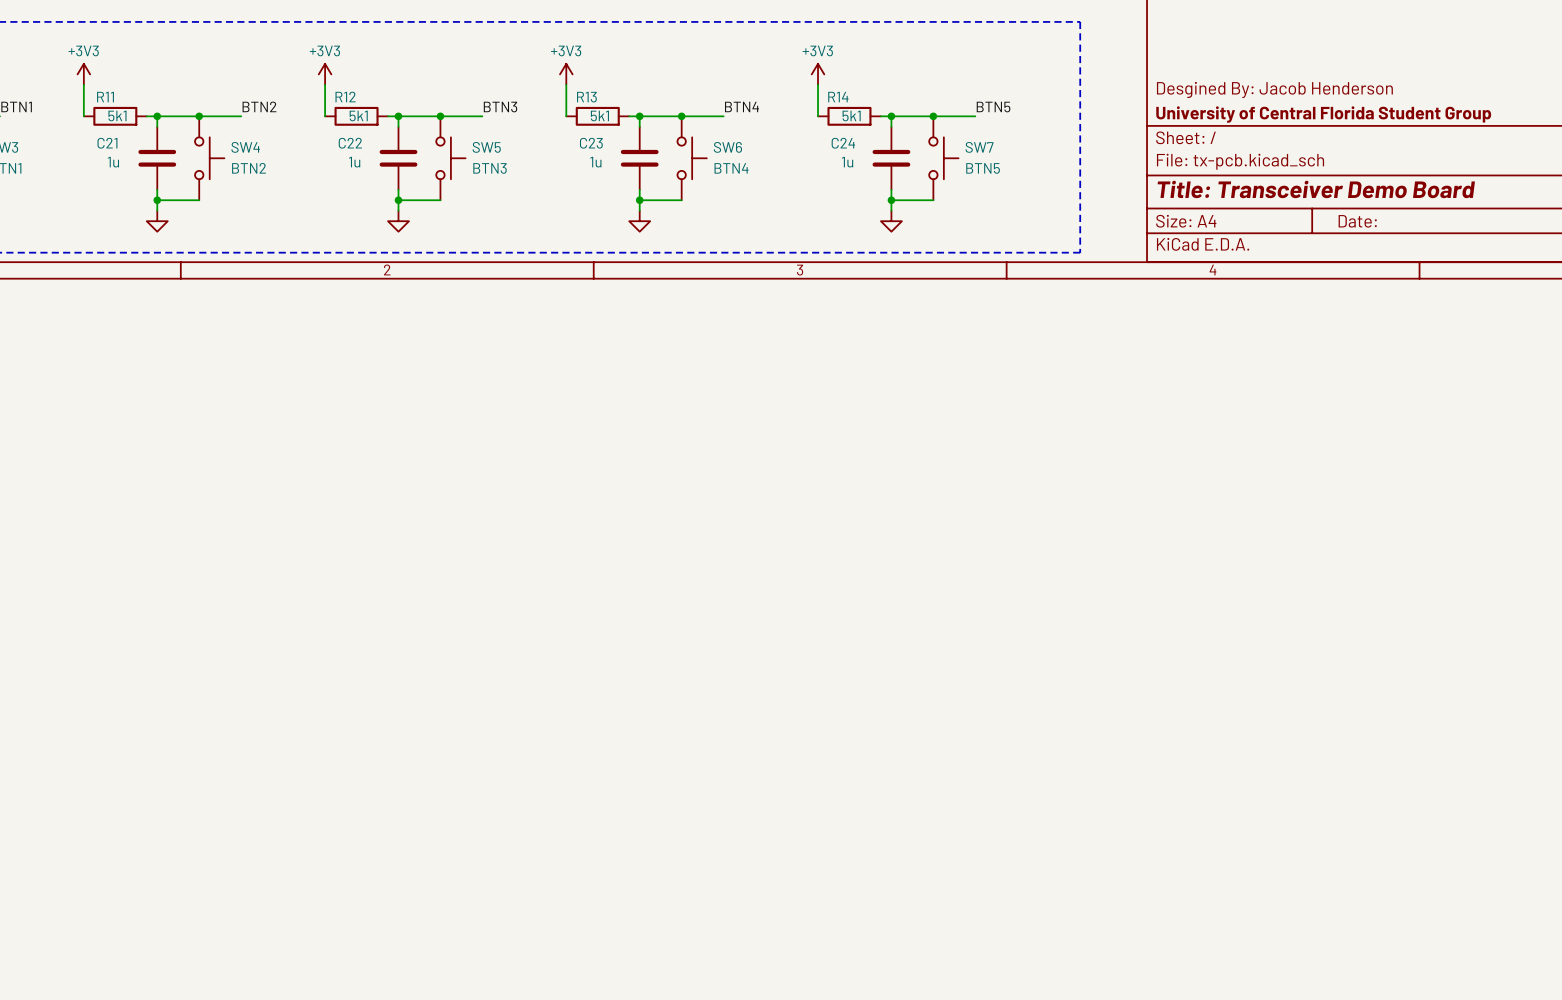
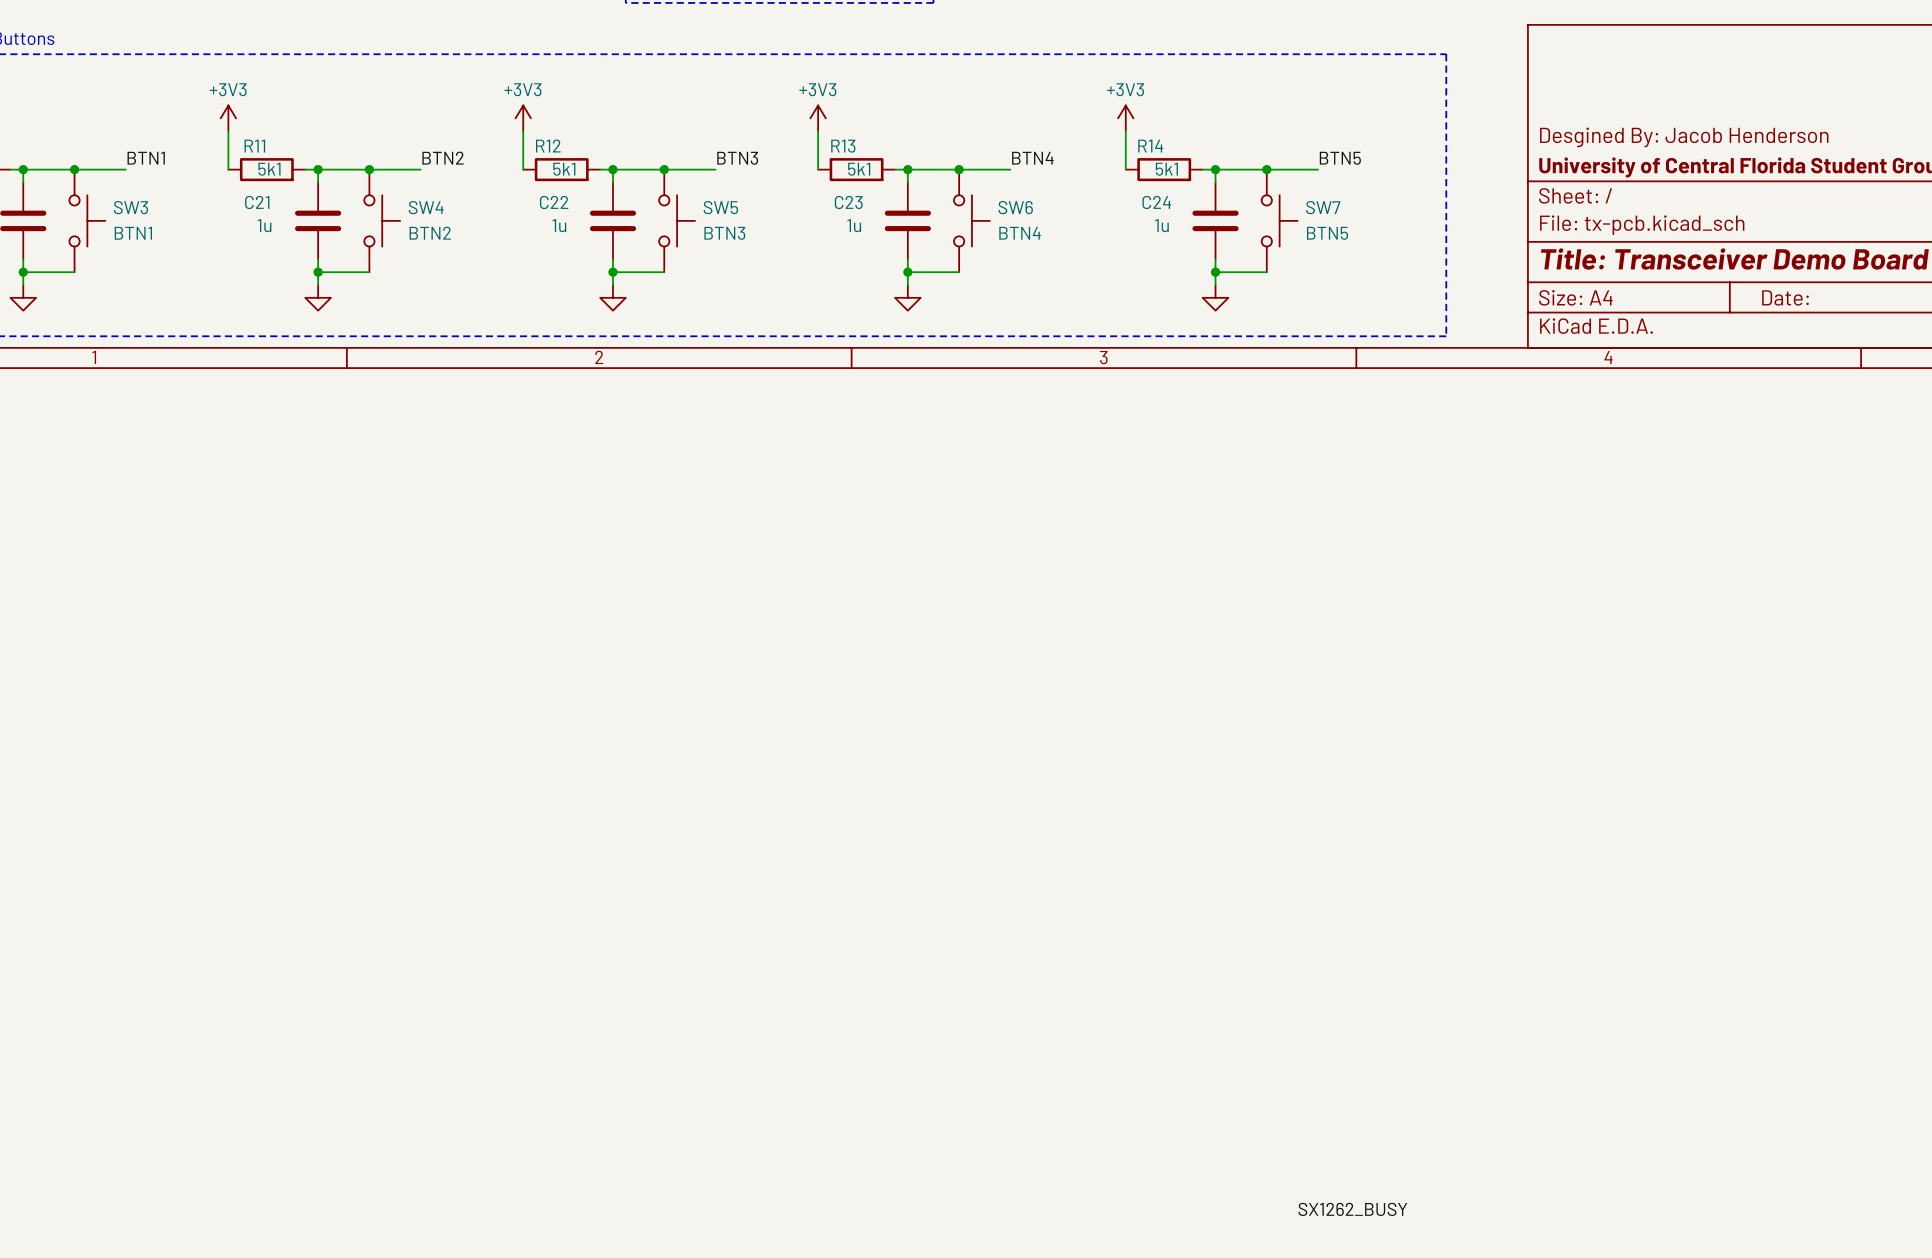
label: none -> SX1262_BUSY (1352, 1209)

